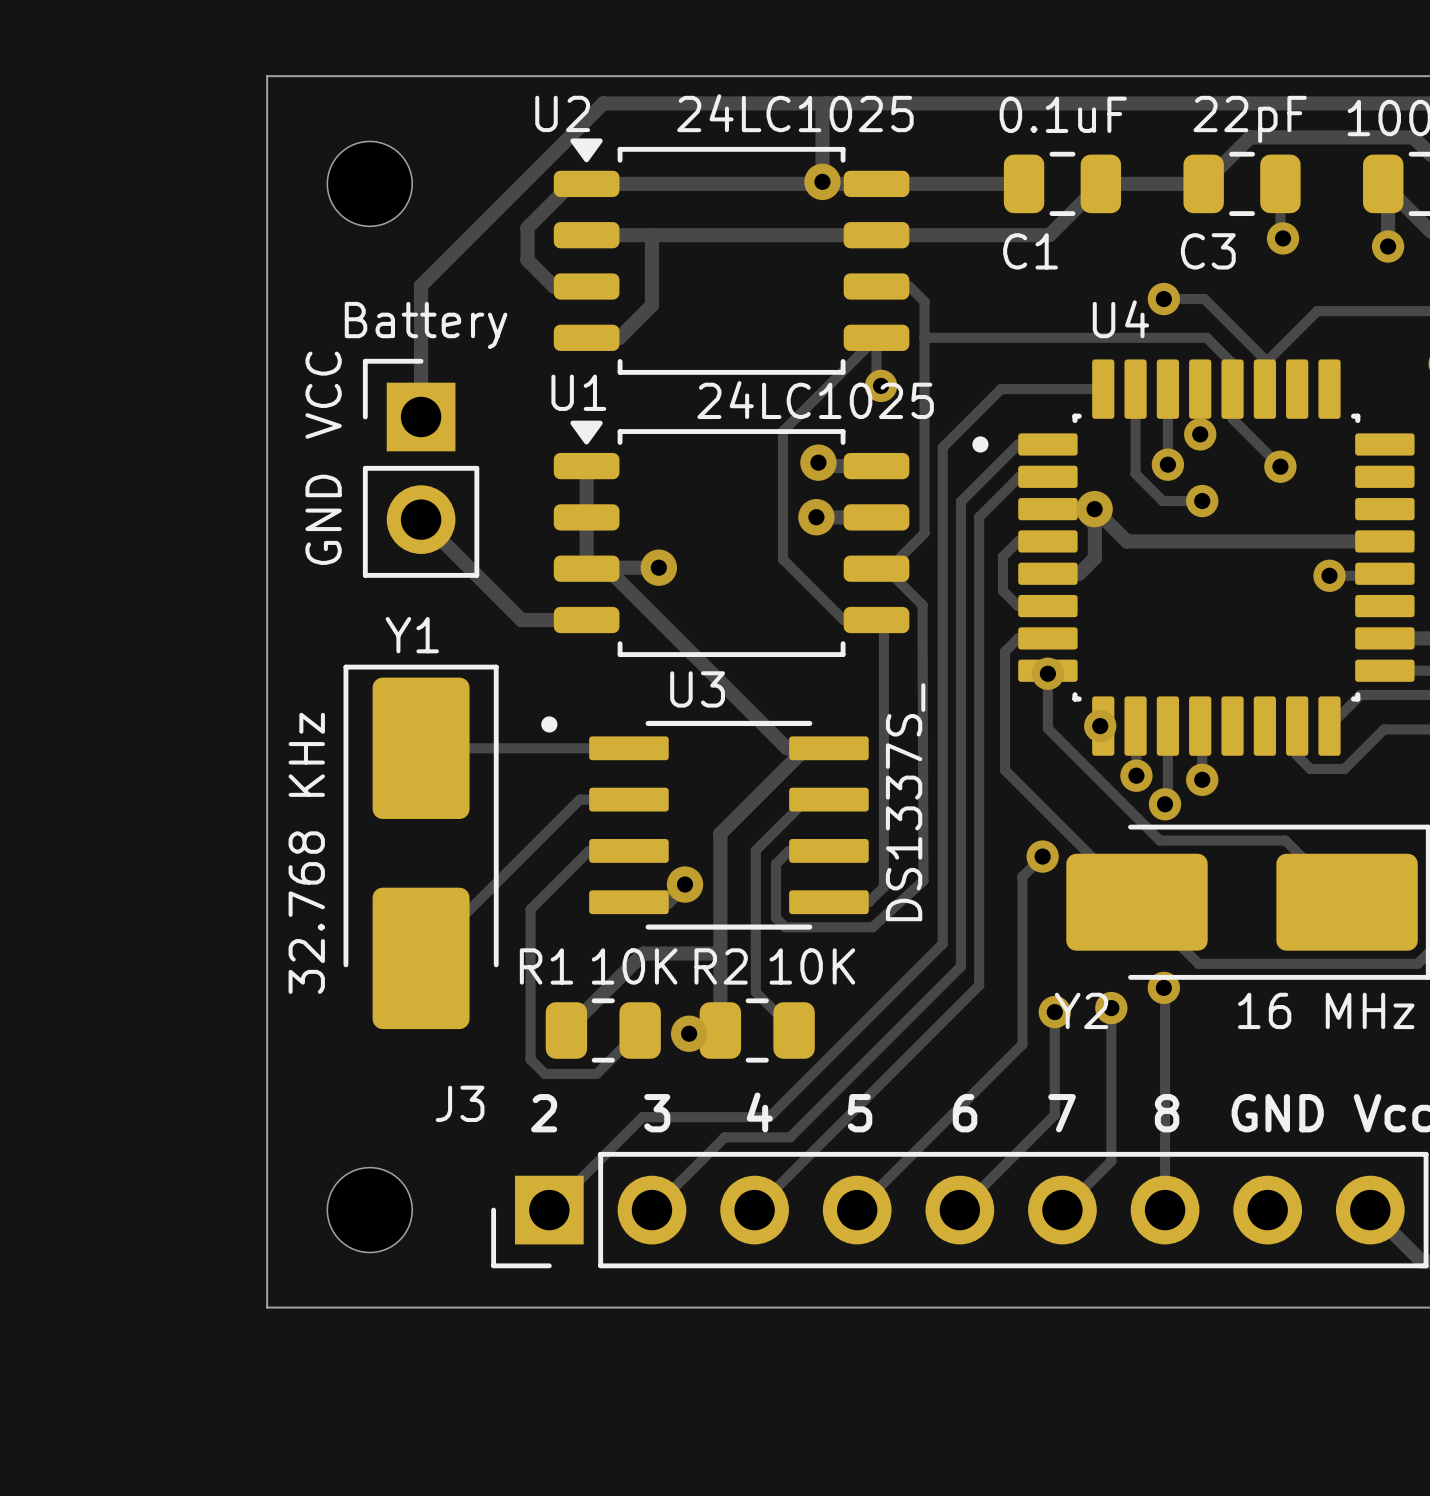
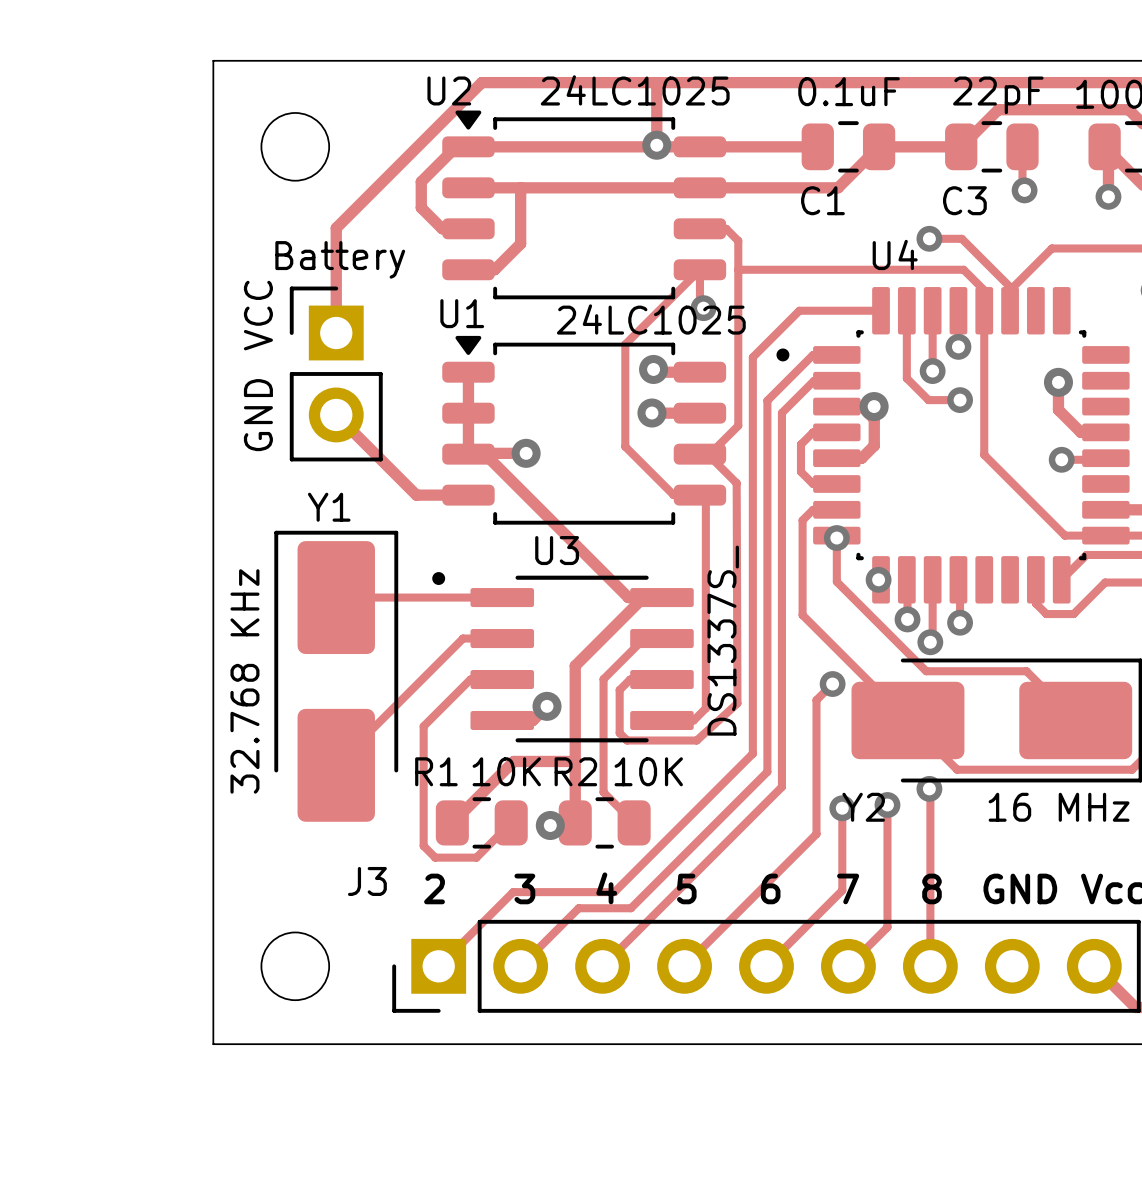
track: (1232, 418) (1280, 466) -> (984, 334) (984, 454) (1064, 535) (1105, 535)
via: (1280, 466) -> none
via: none -> (1058, 382)
track: (1094, 509) (1126, 541) (1353, 541) -> (1058, 382) (1058, 409) (1080, 432)

